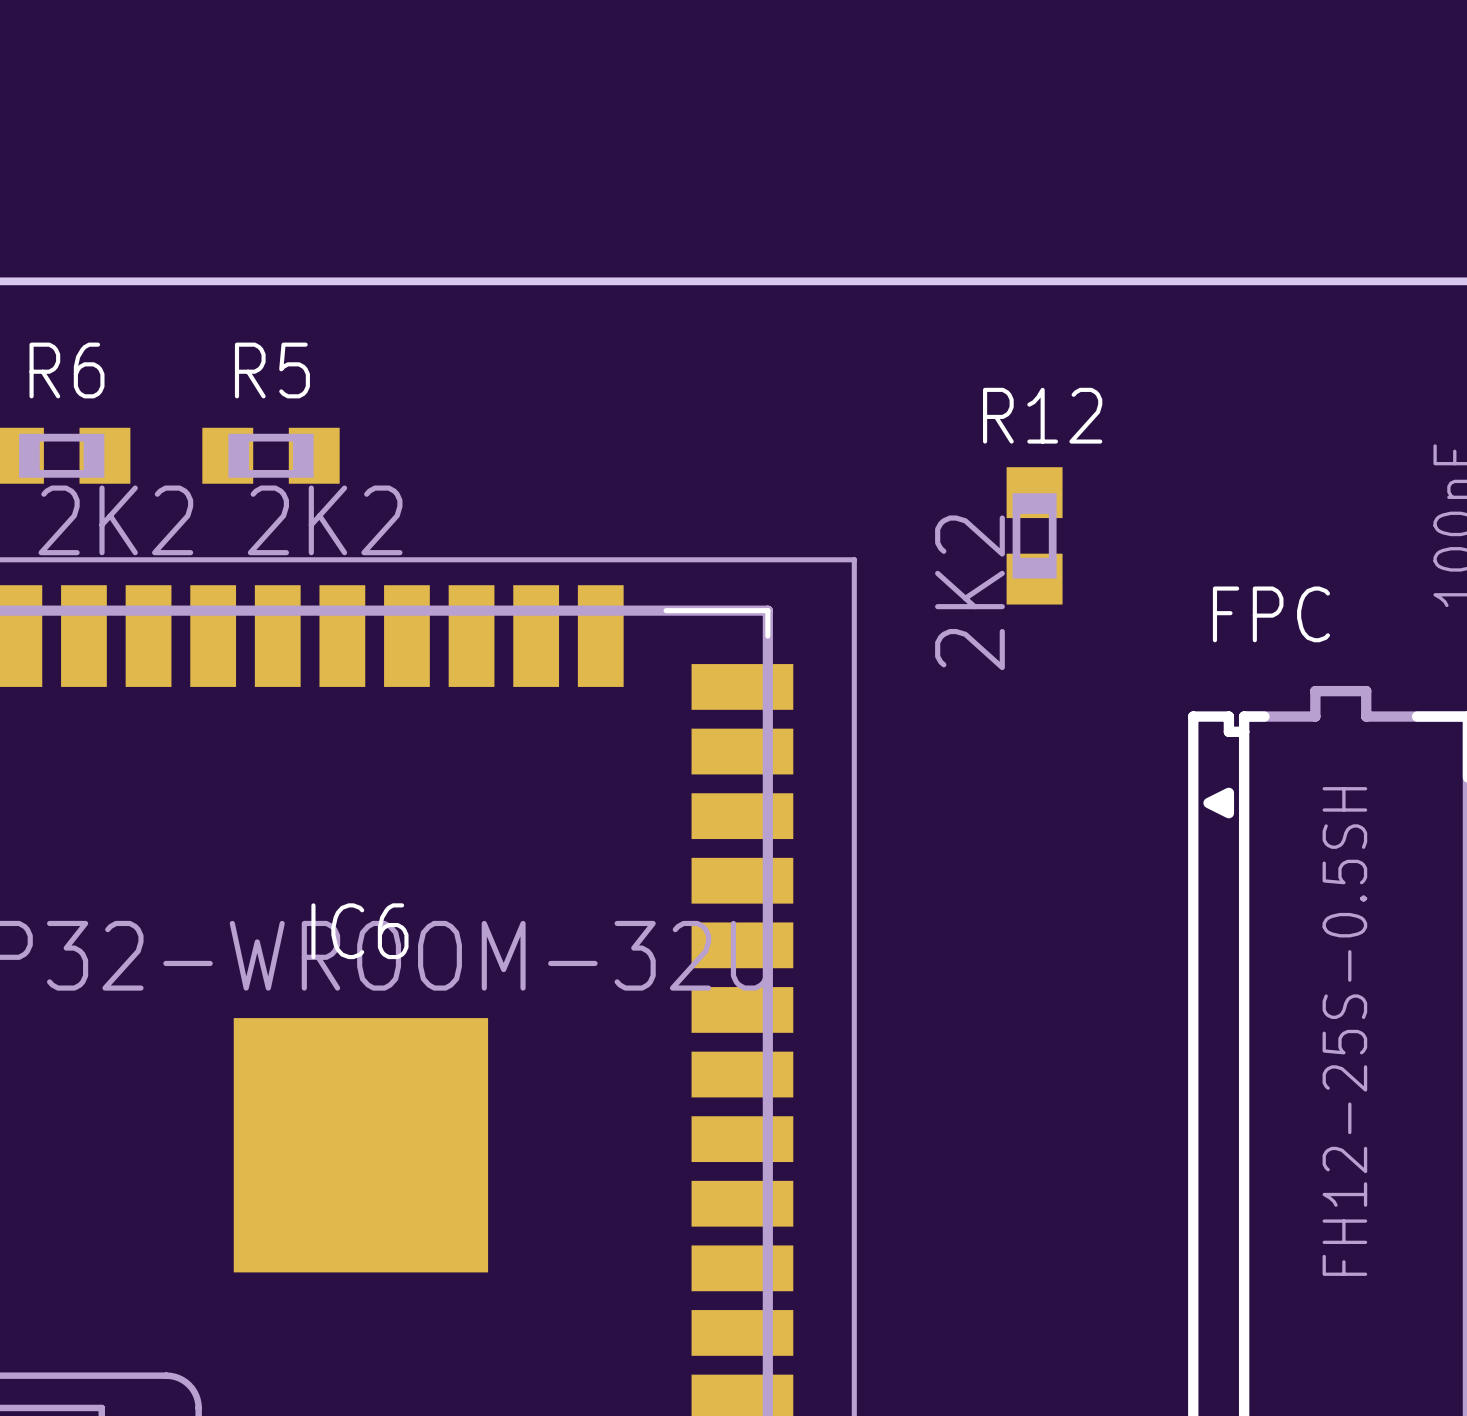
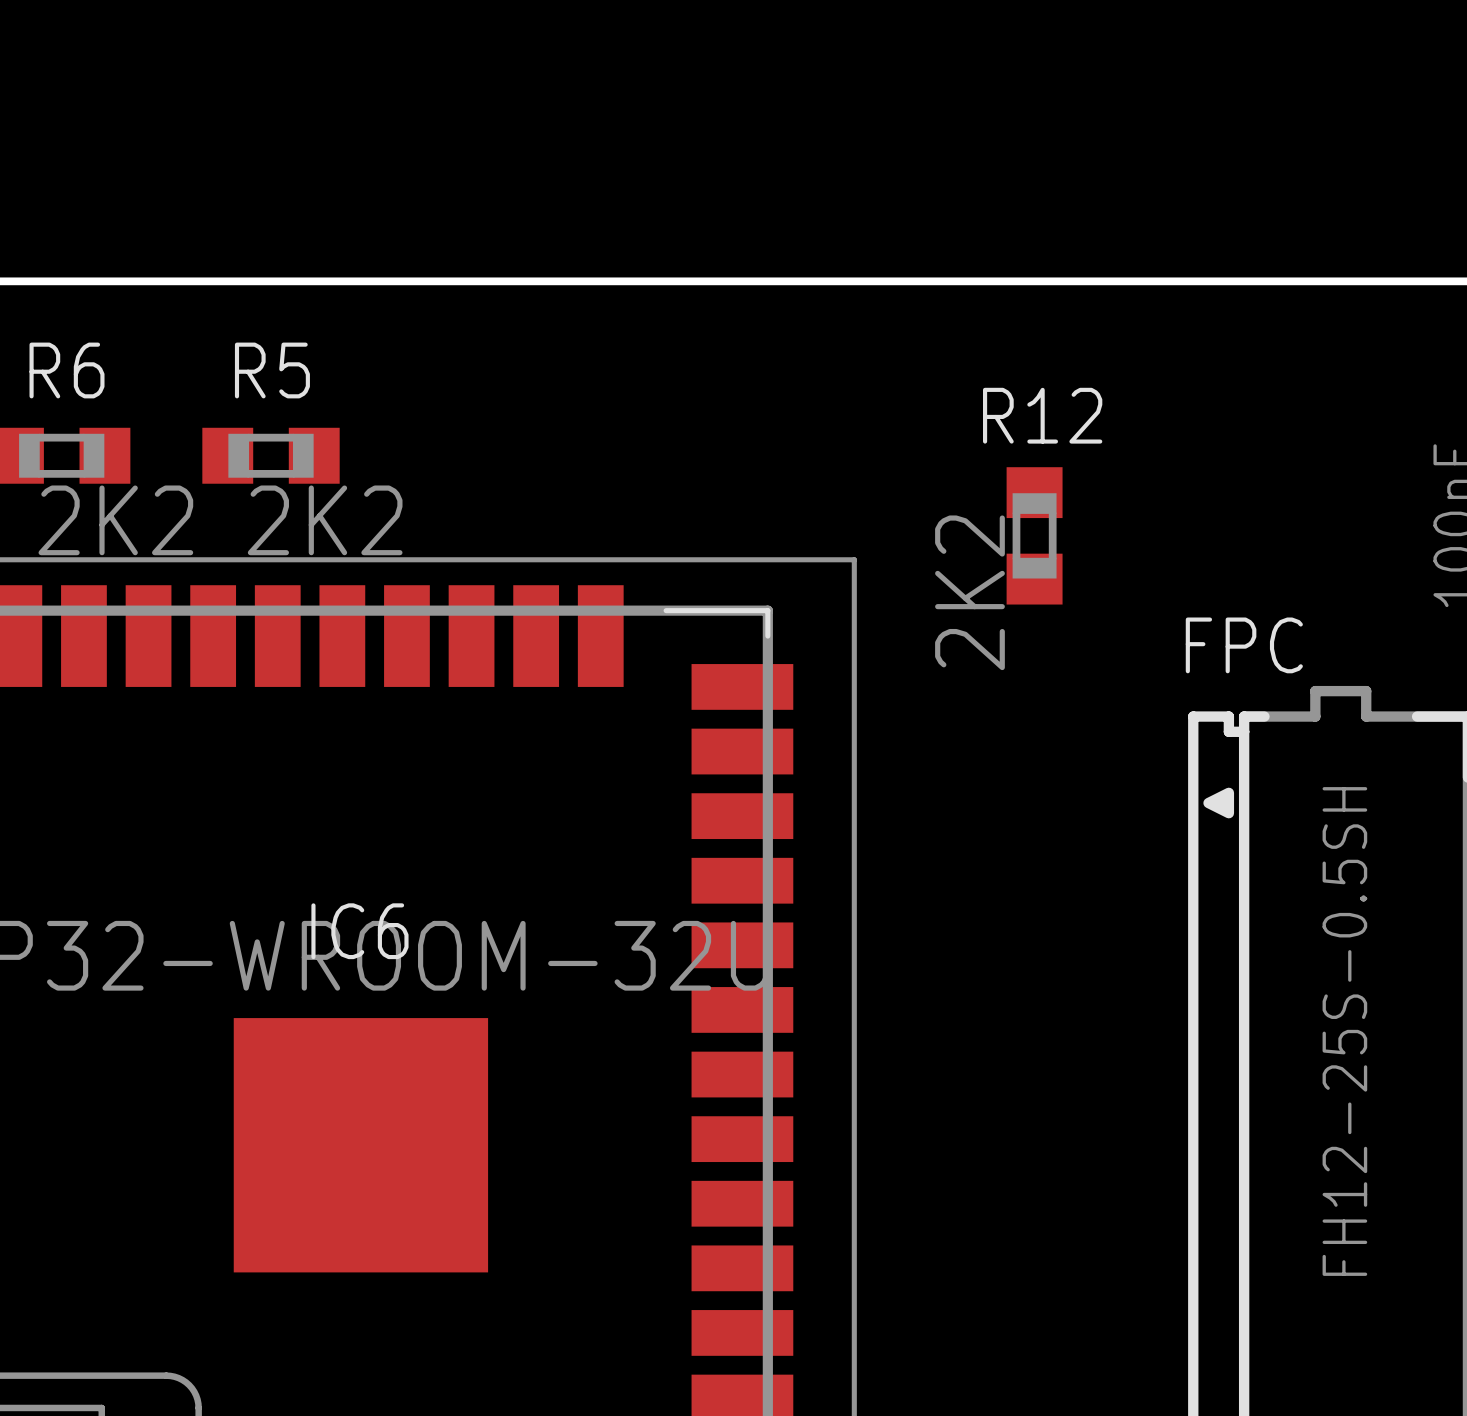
FPC name position: FPC (1271, 614) -> FPC (1244, 645)

